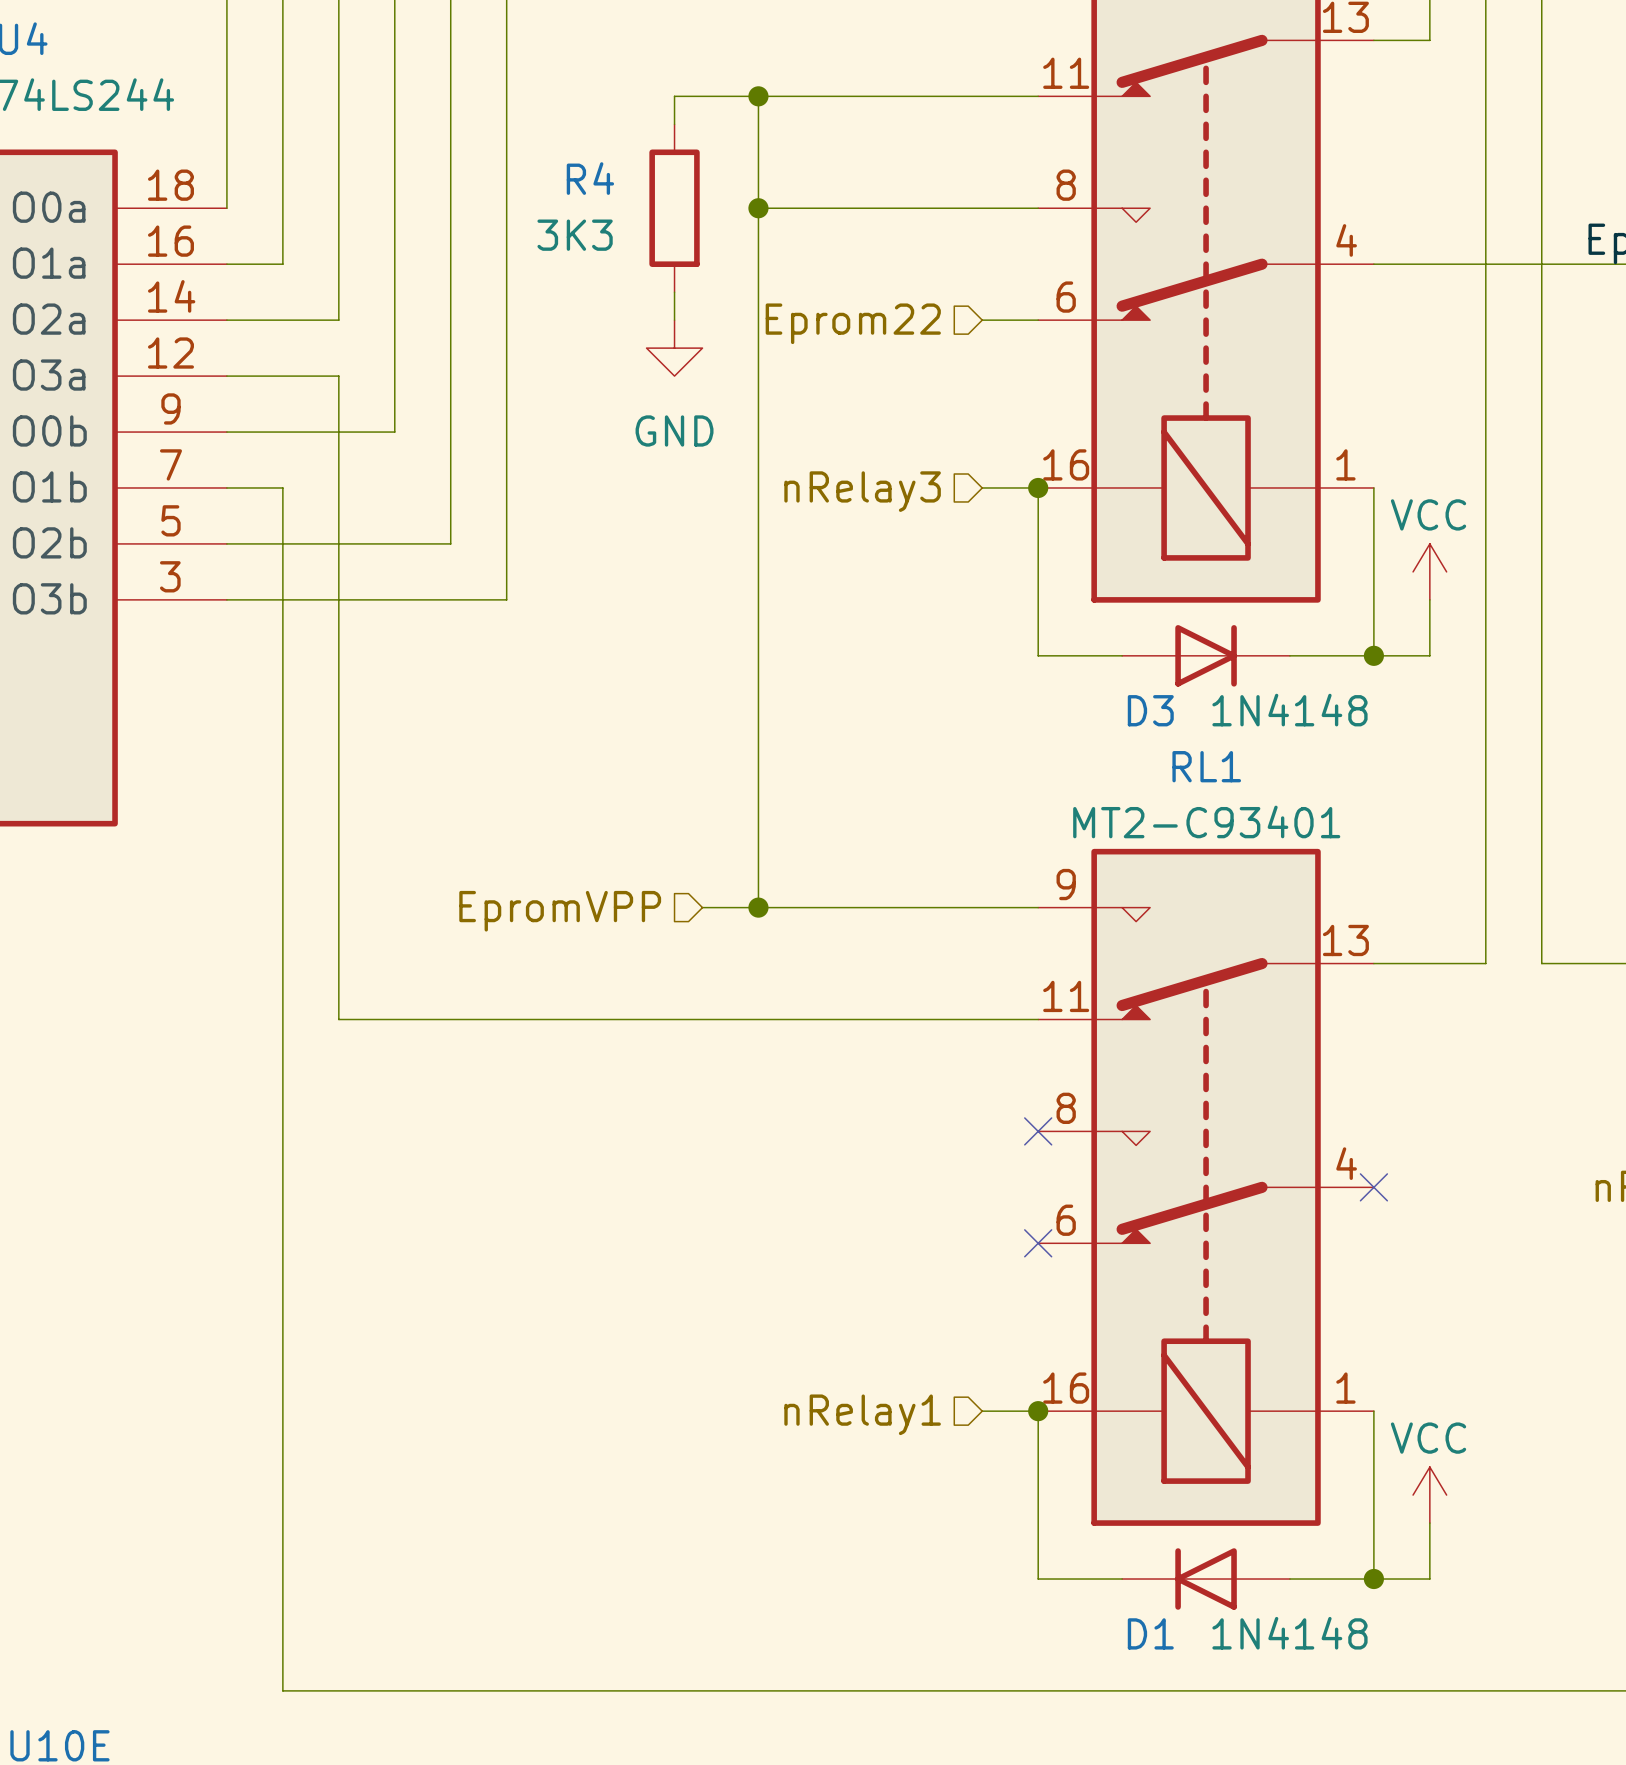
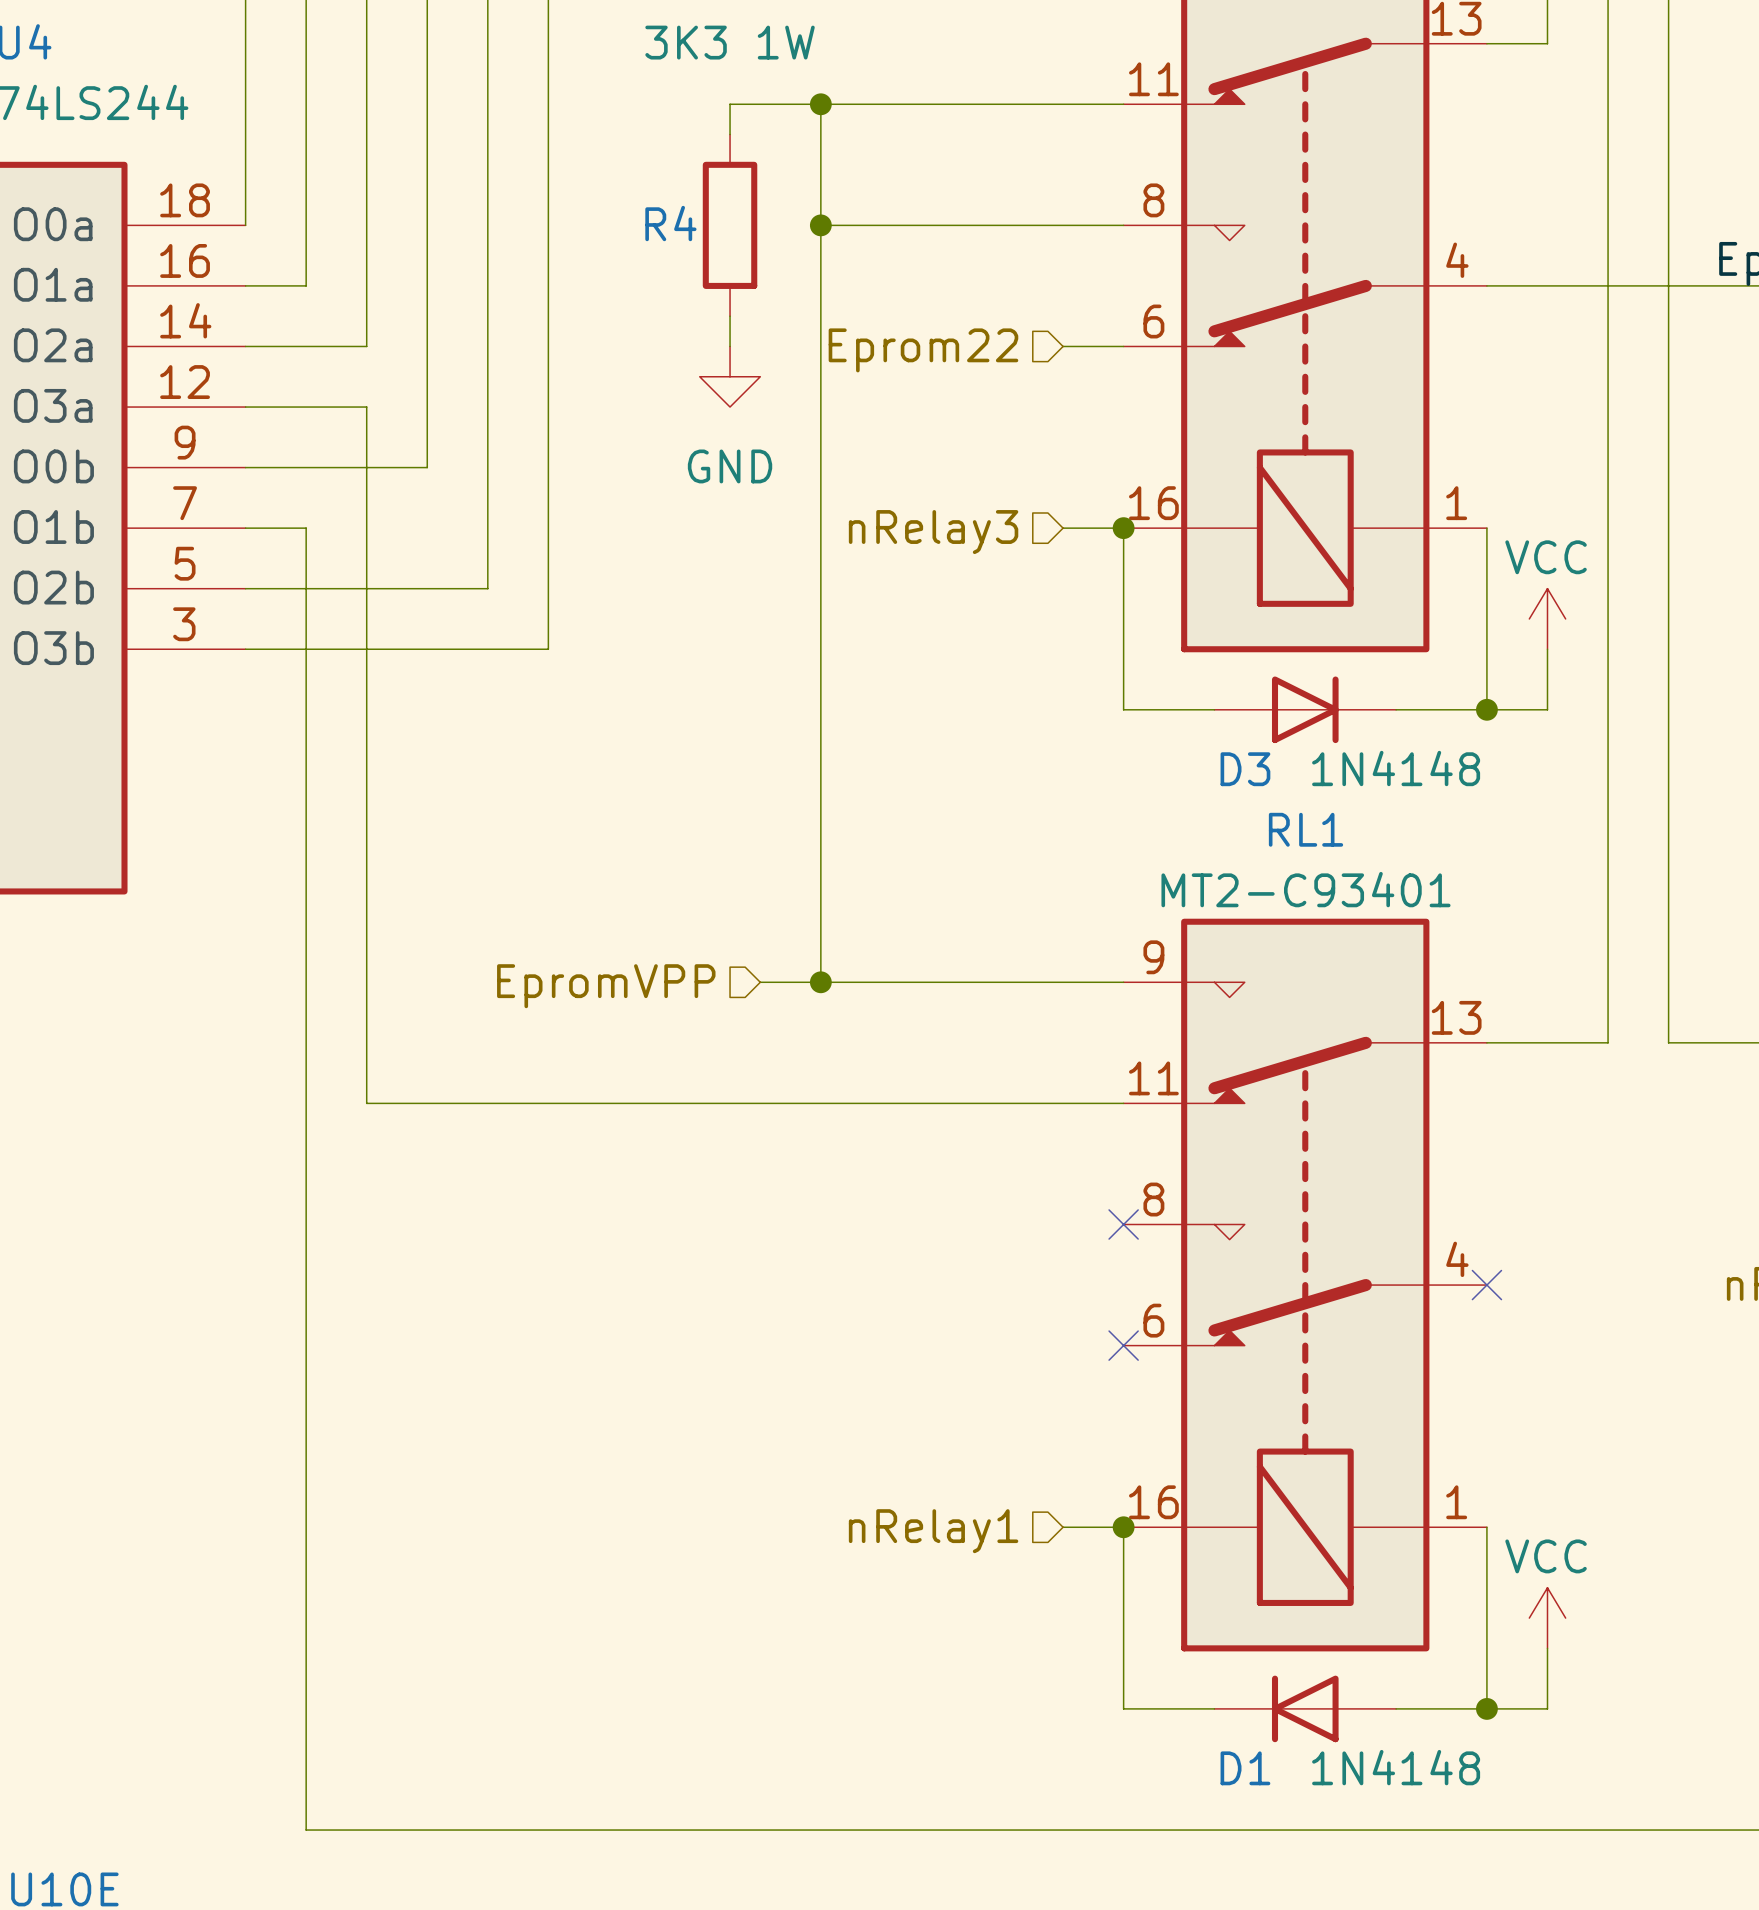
R4 name position: R4 (590, 178) -> R4 (670, 223)
R4 value: 3K3 (575, 235) -> 3K3 1W (730, 42)

